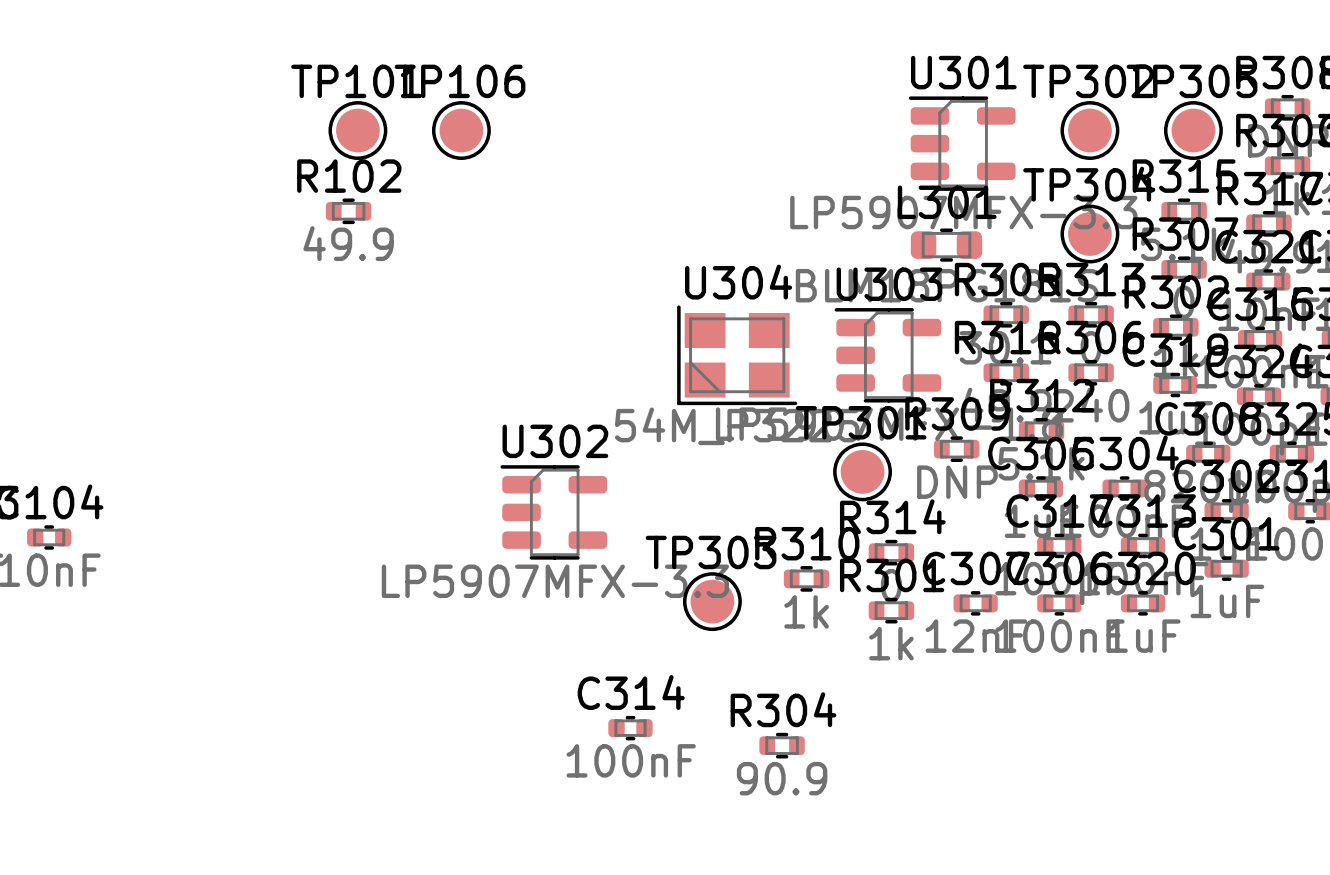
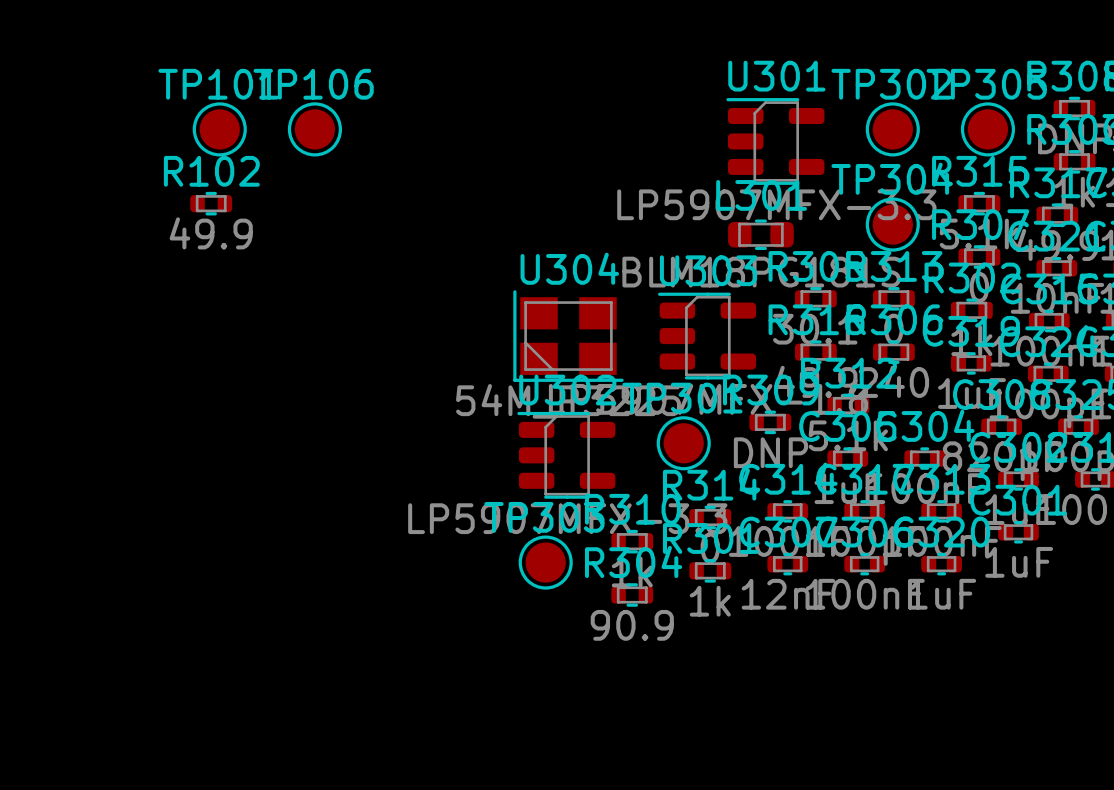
U302 position: (553, 512) -> (566, 455)
C314 position: (630, 728) -> (787, 511)
R304 position: (782, 745) -> (632, 594)

